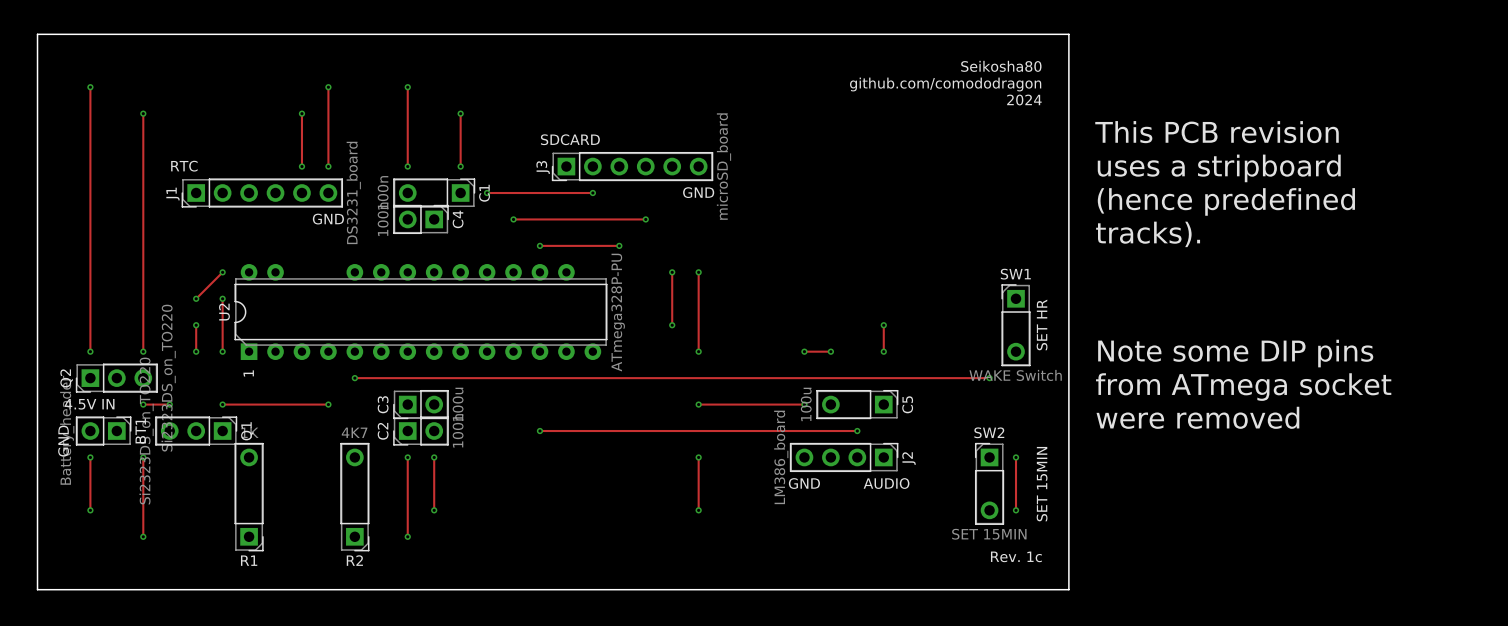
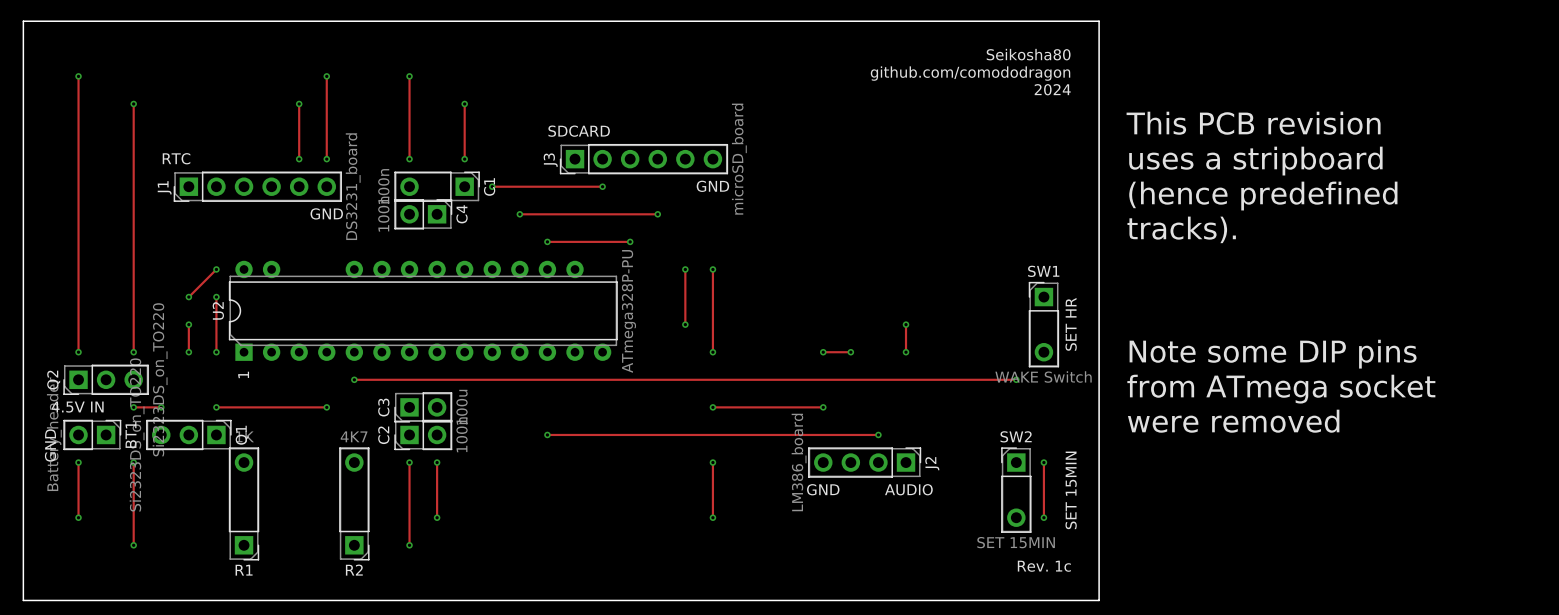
C5: 100u (857, 404) -> none

